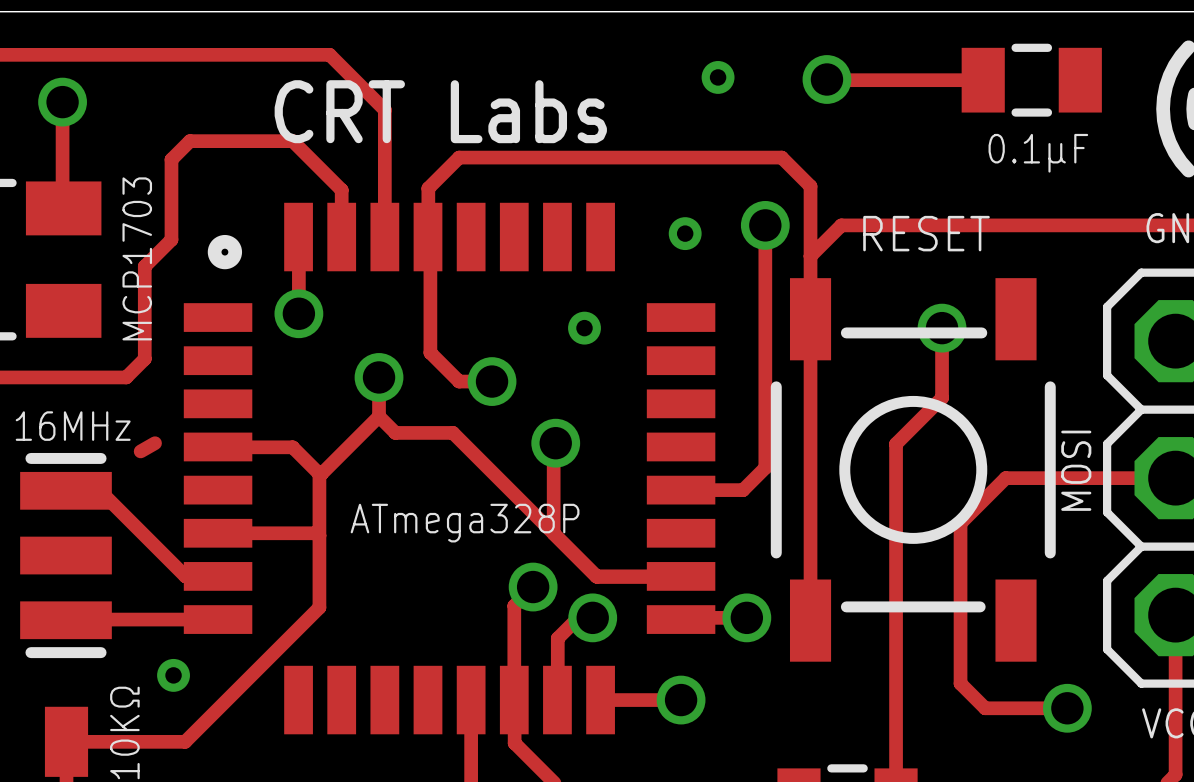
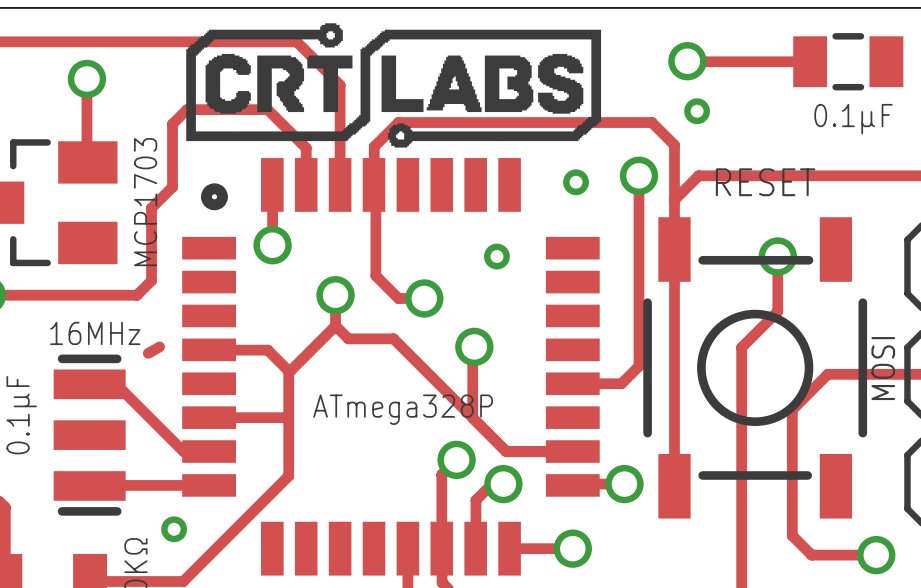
drawing: none -> [186, 23, 602, 148]
via position: (718, 77) -> (697, 111)
text: CRT Labs (440, 111) -> none

